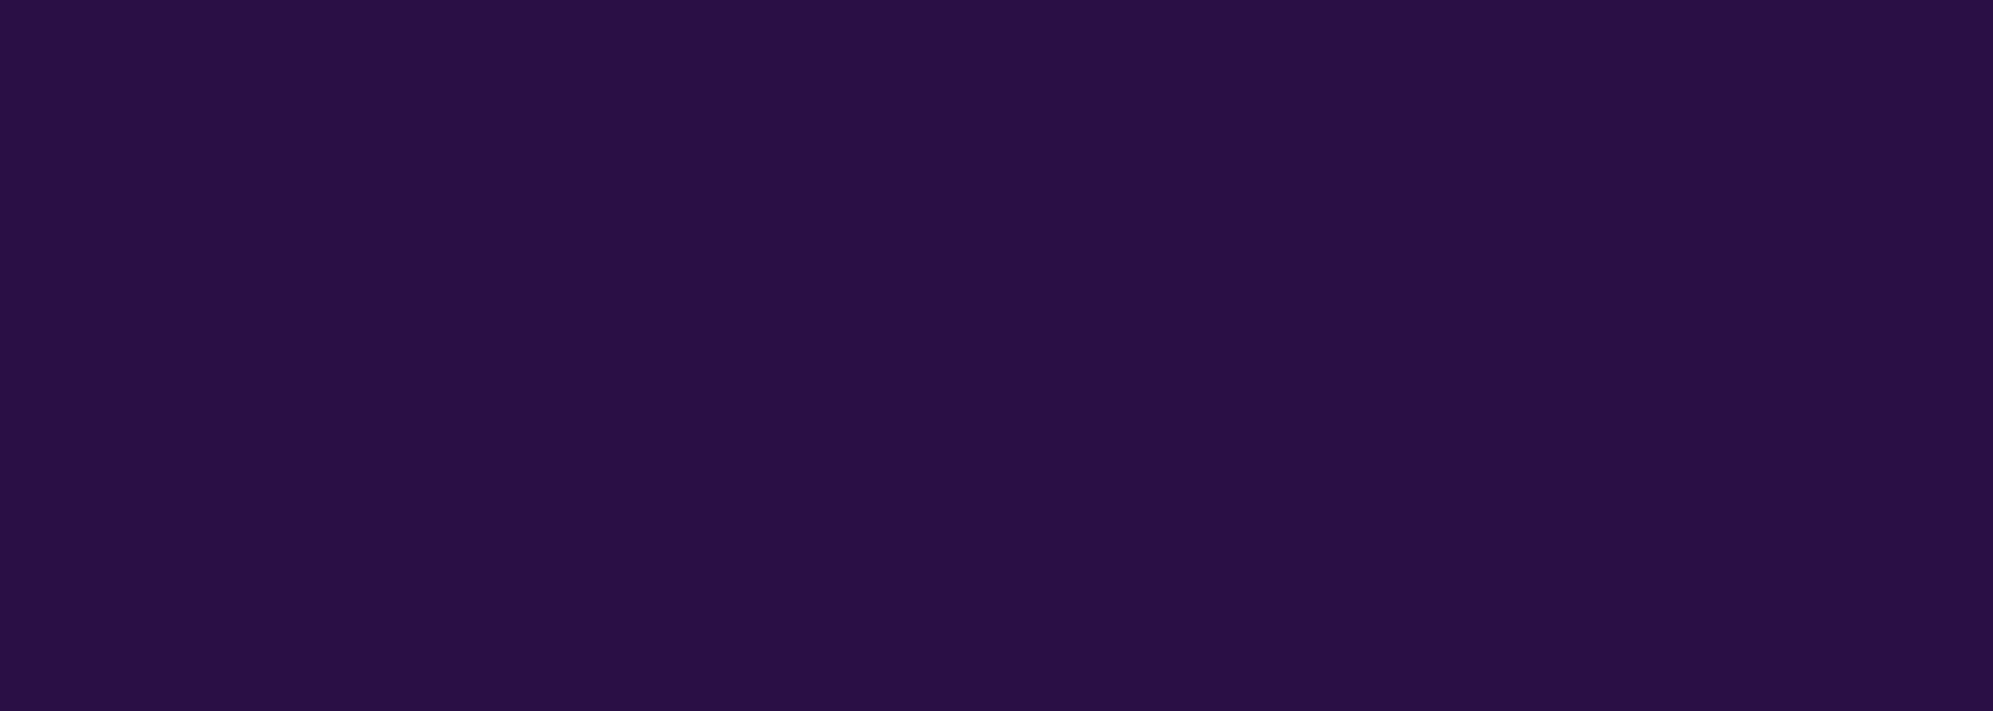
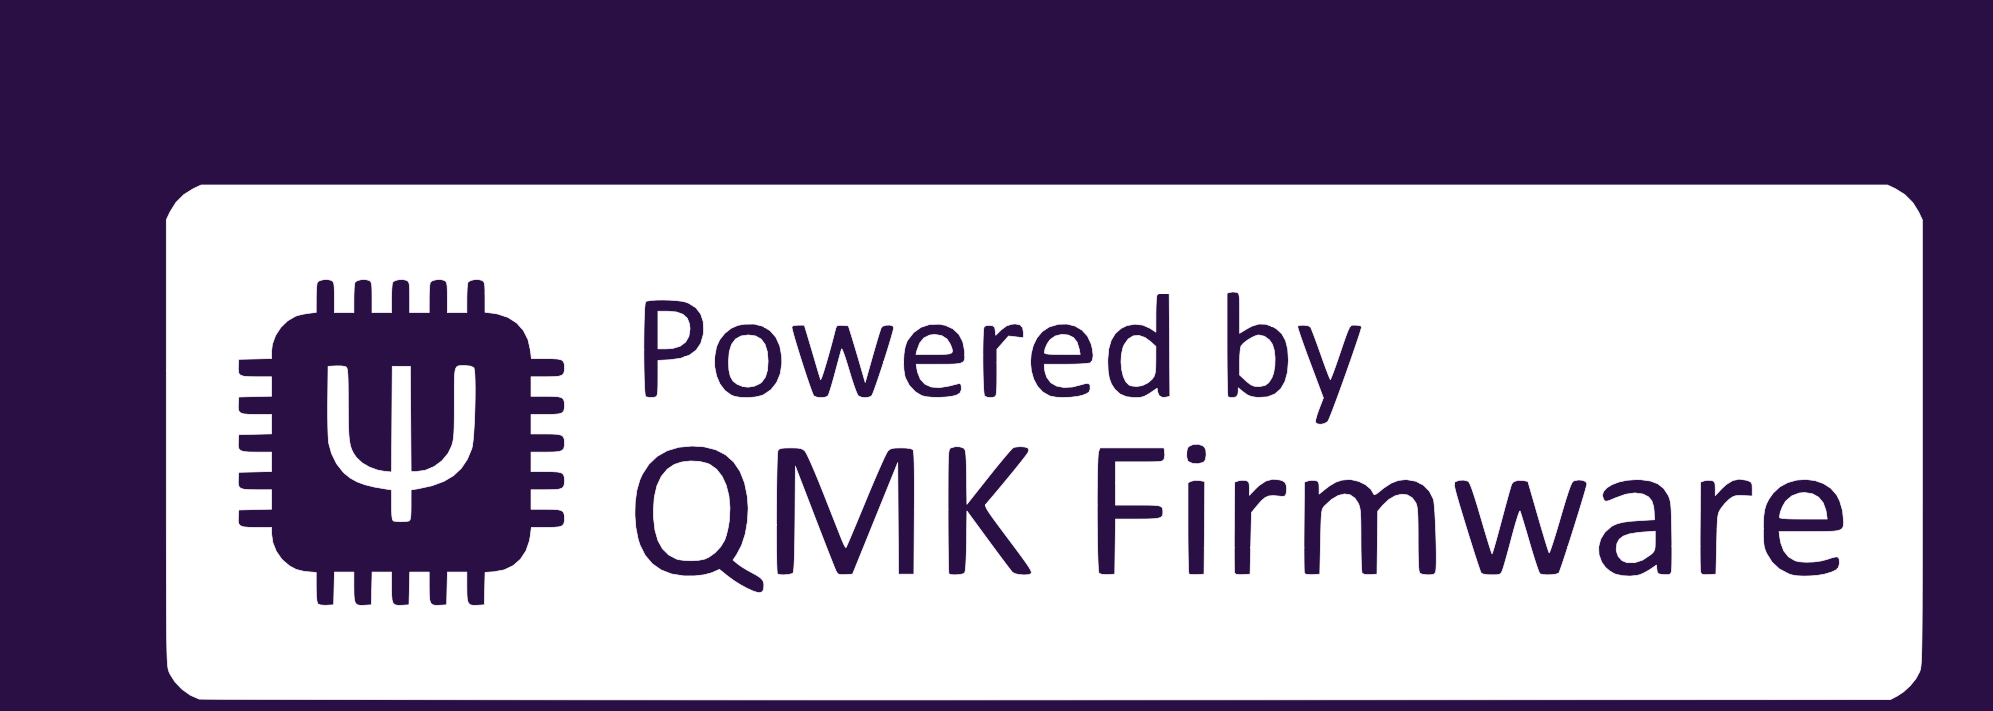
drawing: none -> [165, 184, 1923, 701]

